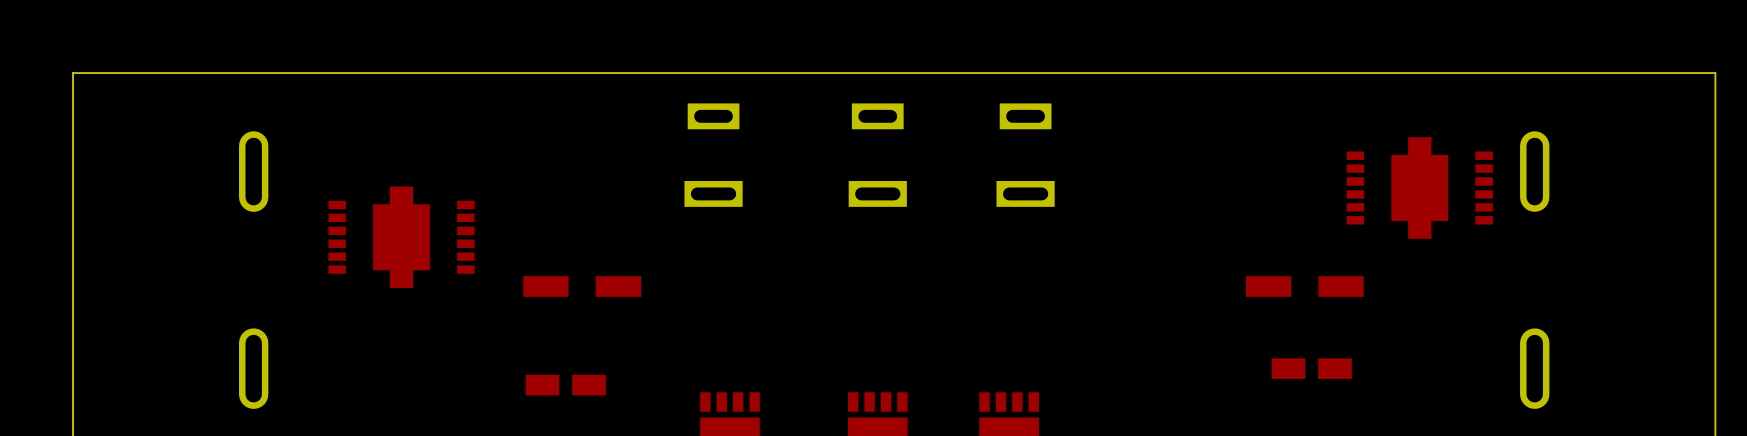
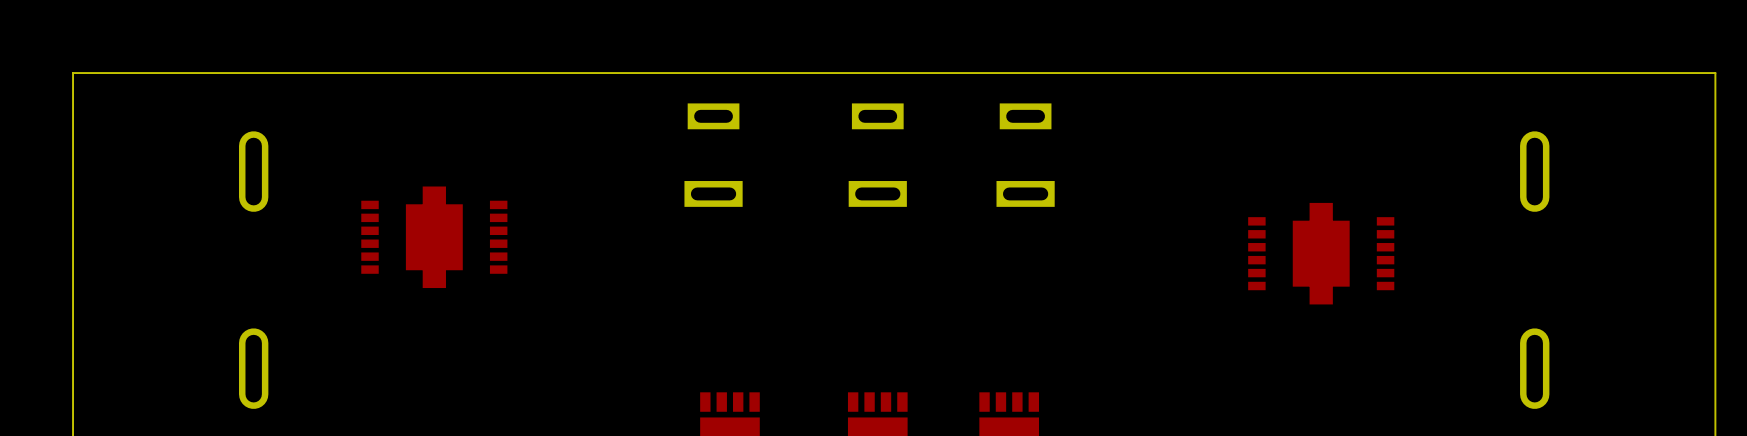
part position: (1419, 187) -> (1321, 253)
part position: (401, 237) -> (434, 237)
part: (582, 286) -> none
part: (1304, 286) -> none
part: (1311, 368) -> none
part: (565, 385) -> none

